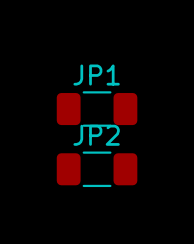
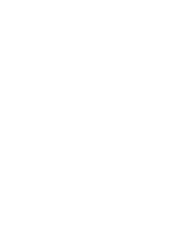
JP1: (97, 109) -> none
JP2: (97, 169) -> none

